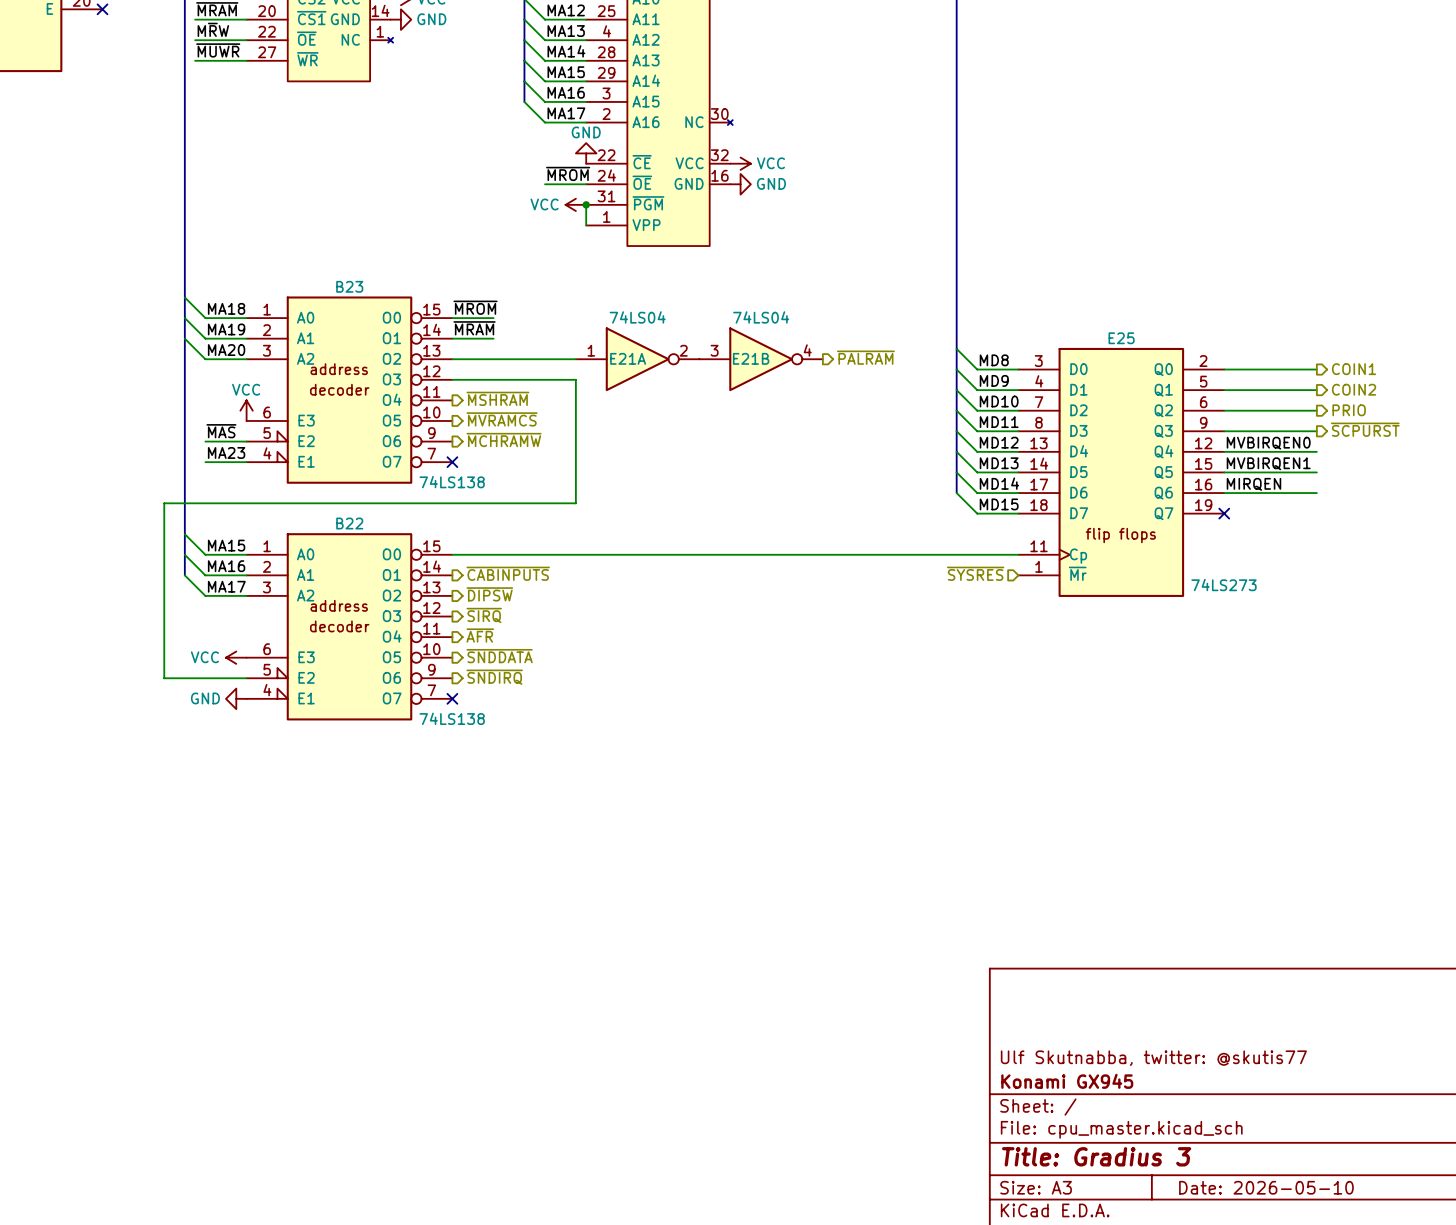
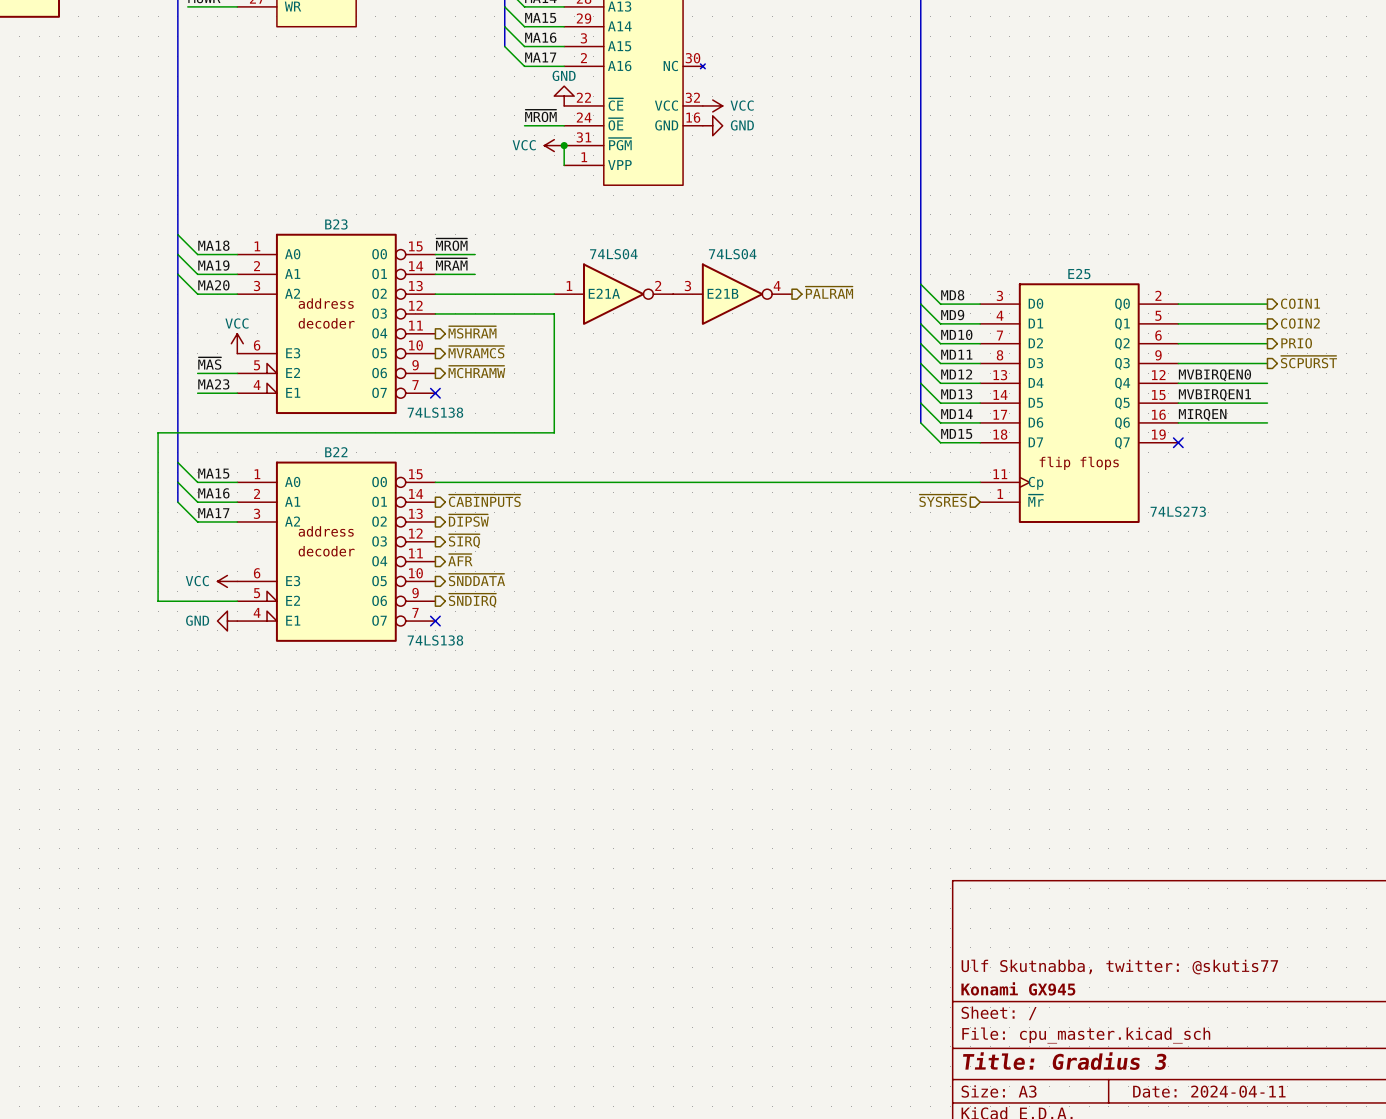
title block: Date: 2026-05-10 (1266, 1187) -> Date: 2024-04-11 (1209, 1091)

